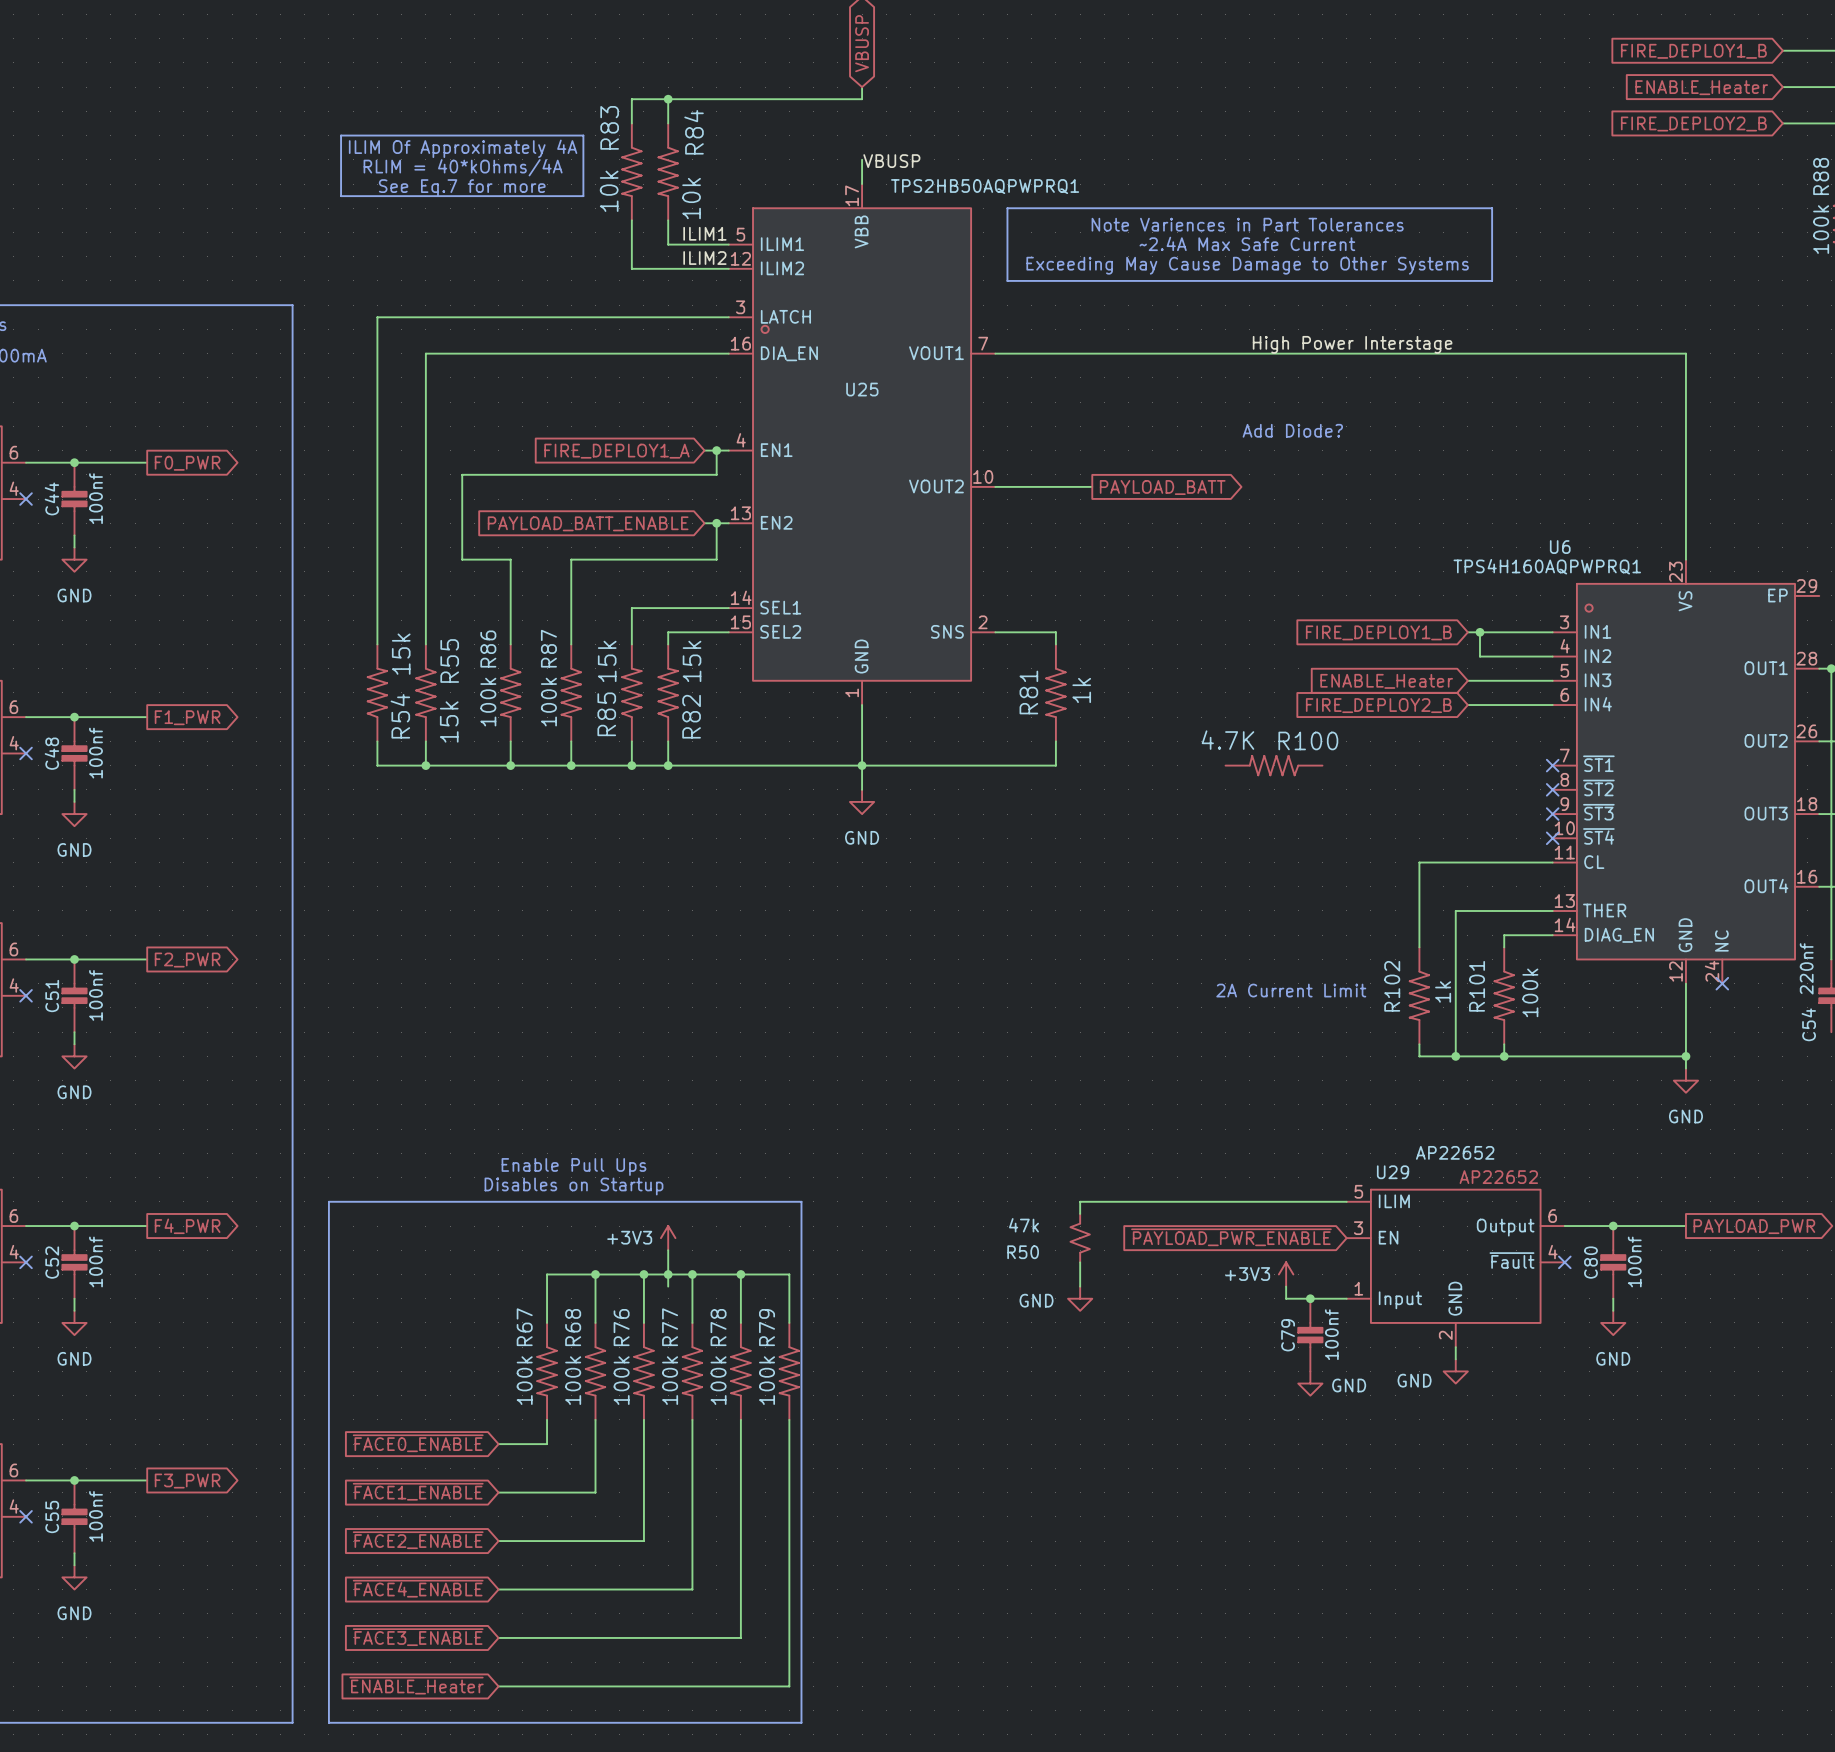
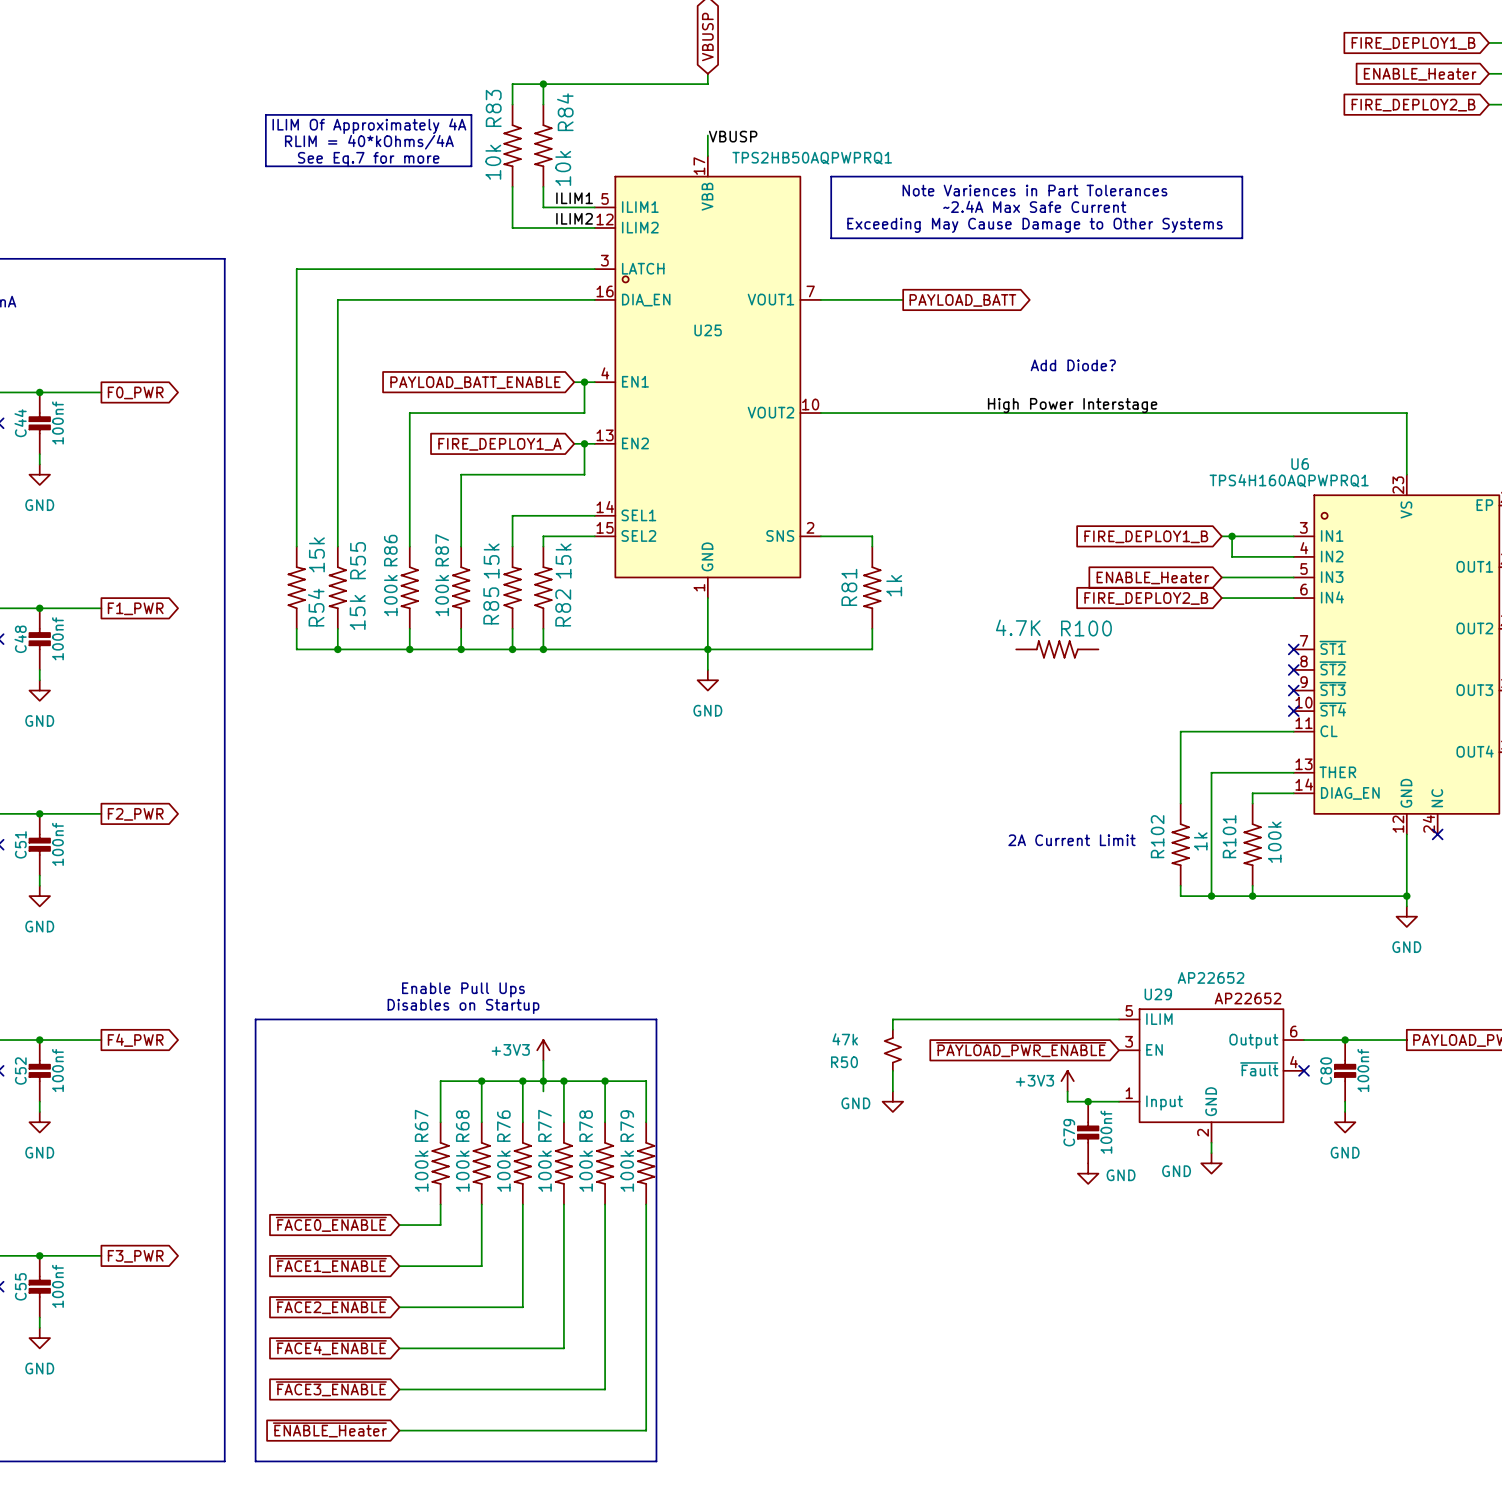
label position: High Power Interstage (1352, 344) -> High Power Interstage (1072, 405)
wire: (1092, 353) (1685, 353) (1685, 486) -> (903, 413) (1406, 413)
global label: FIRE_DEPLOY1_A (616, 451) -> PAYLOAD_BATT_ENABLE (475, 382)
wire: (716, 474) (462, 474) (462, 559) (510, 559) -> (584, 402) (584, 413) (409, 413) (409, 474)
global label position: PAYLOAD_BATT (1162, 487) -> PAYLOAD_BATT (962, 300)
global label: PAYLOAD_BATT_ENABLE (588, 523) -> FIRE_DEPLOY1_A (499, 444)

